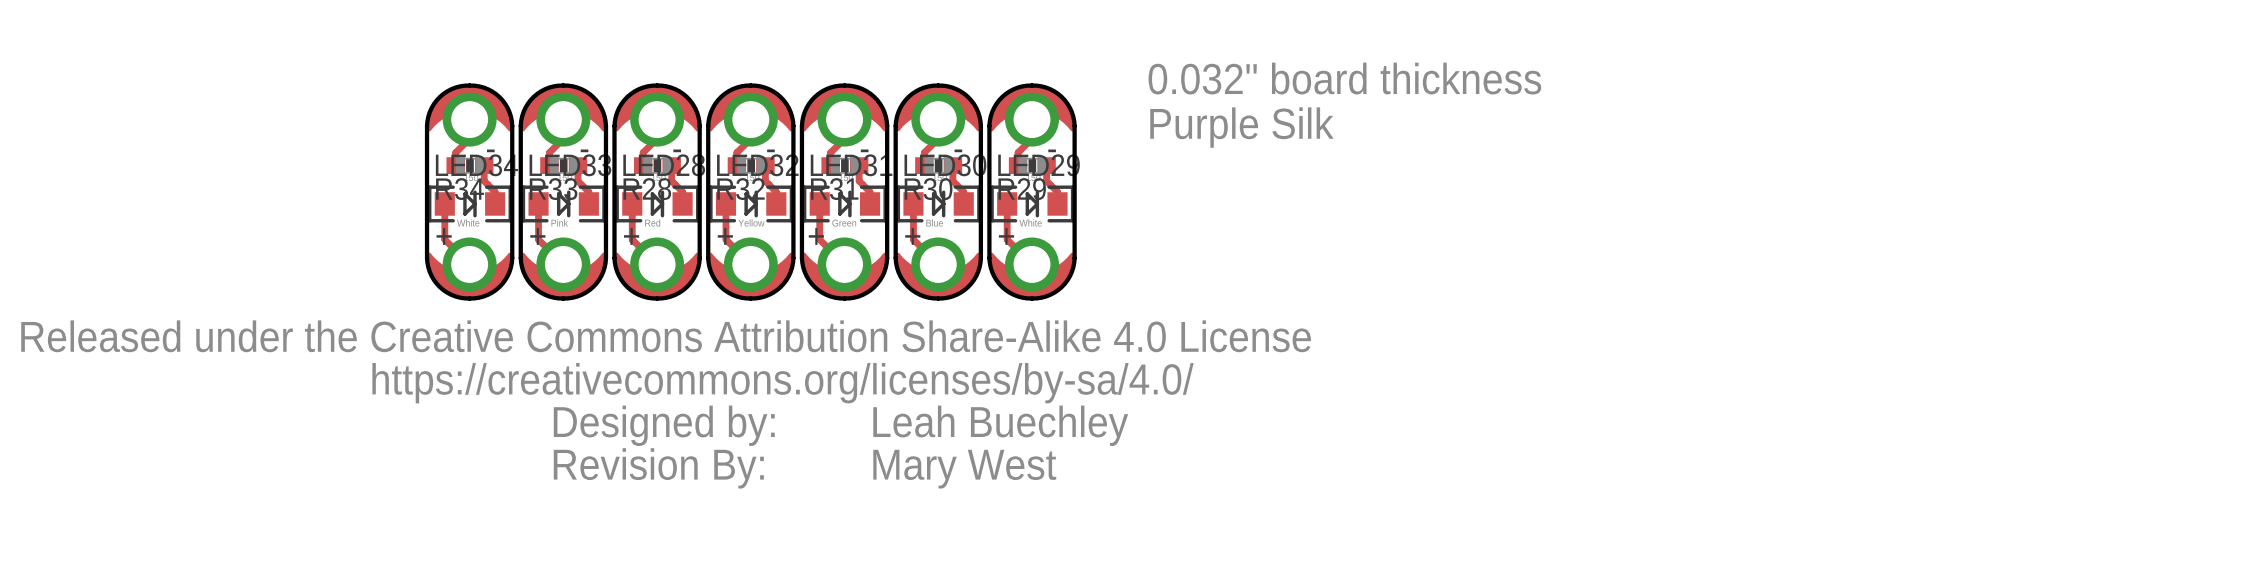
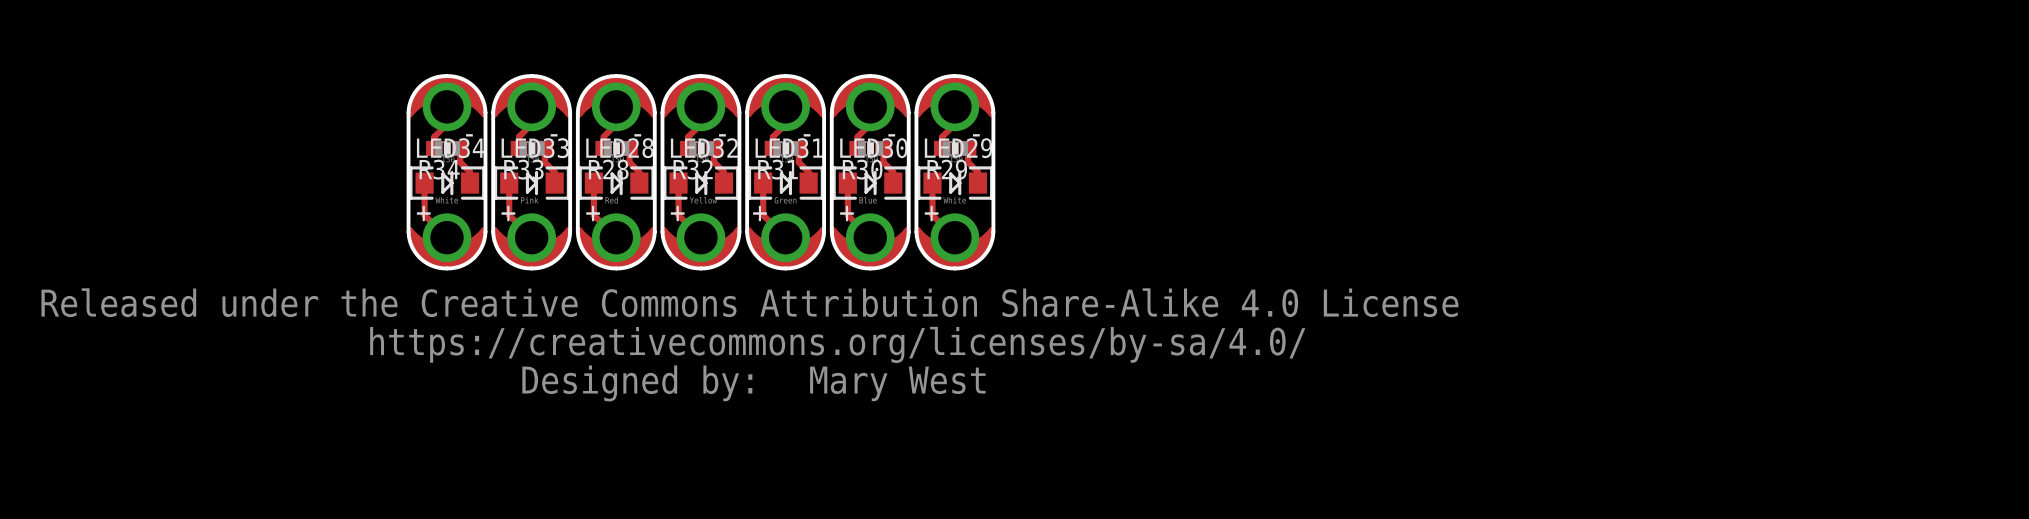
text: 0.032" board thickness (1344, 78) -> none
text: Purple Silk (1241, 127) -> none
text: Leah Buechley (1000, 425) -> Mary West (897, 383)
drawing: [553, 448, 764, 489] -> none
text: Mary West (964, 469) -> none

